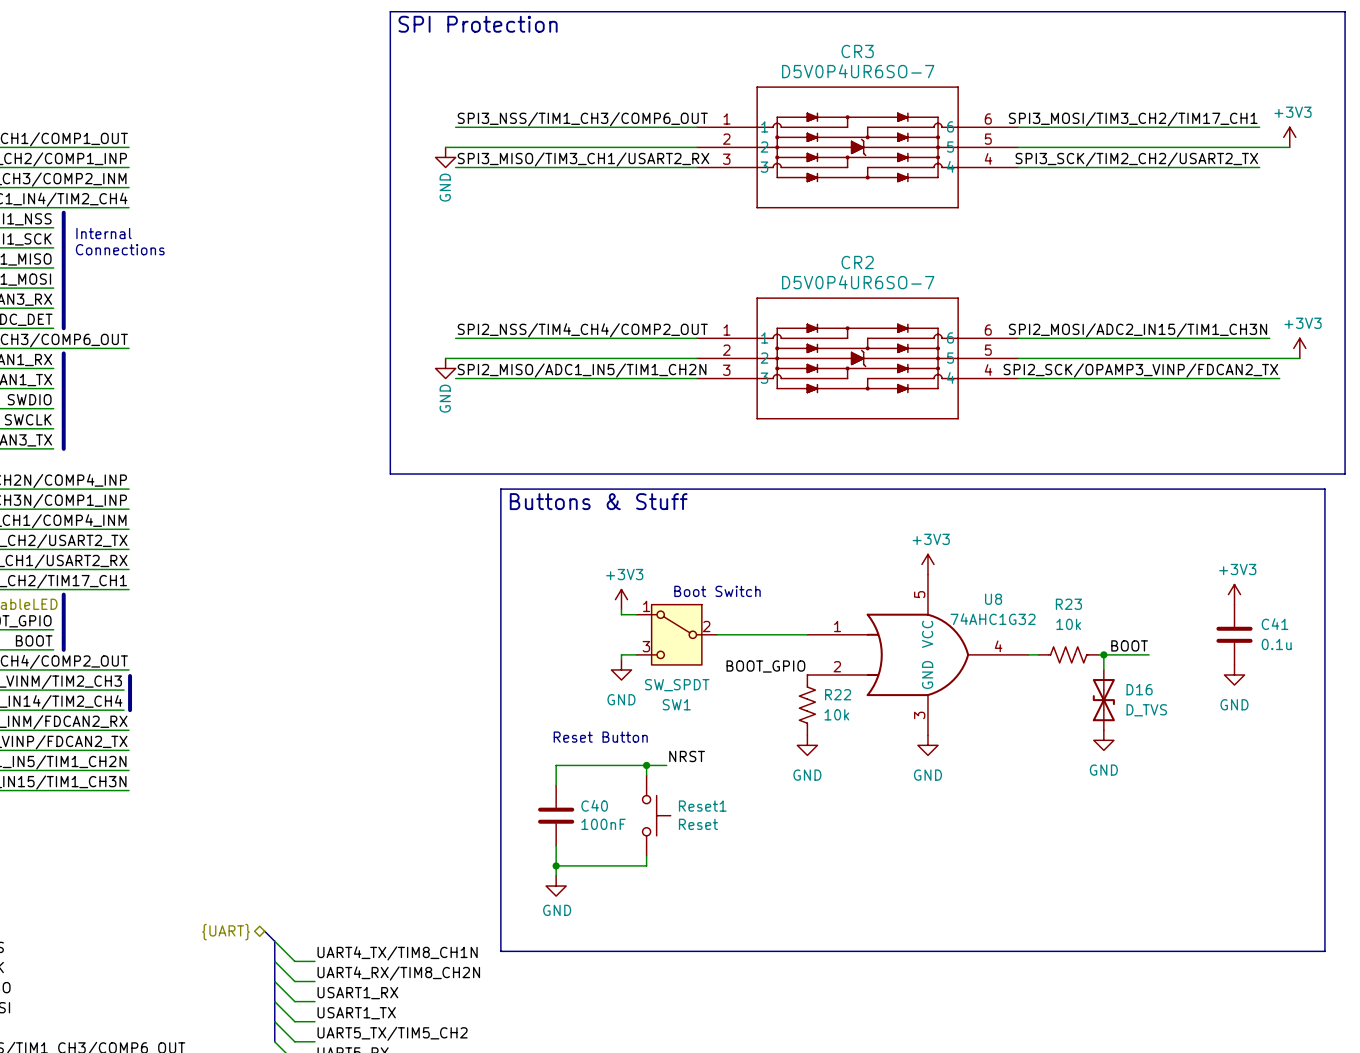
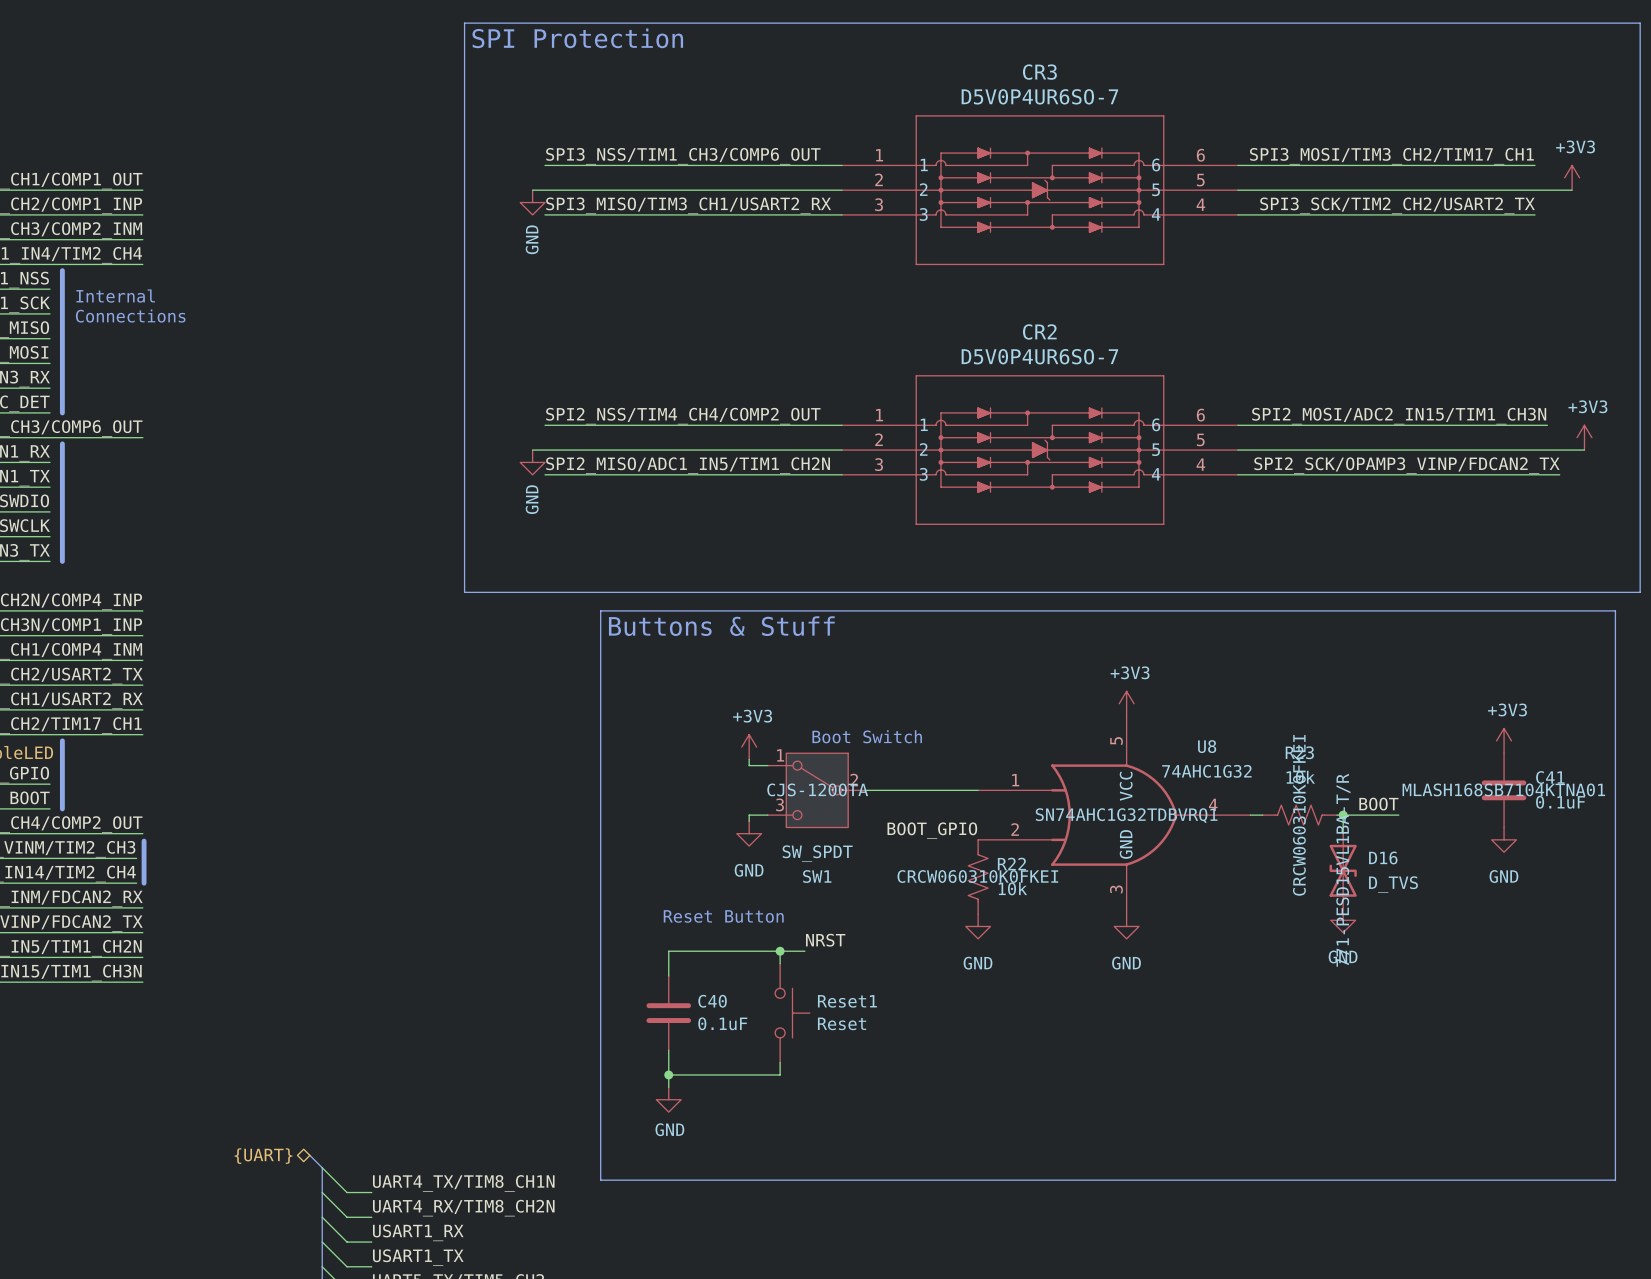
SW1 text: none -> CJS-1200TA (817, 789)
C41 text: none -> MLASH168SB7104KTNA01 (1503, 789)
C41 value: 0.1u (1276, 644) -> 0.1uF (1560, 802)
U8 text: none -> SN74AHC1G32TDBVRQ1 (1126, 815)
R23 text: none -> CRCW060310K0FKEI (1299, 815)
D16 text: none -> 771-PESD15VL1BA-T/R (1343, 870)
R22 text: none -> CRCW060310K0FKEI (977, 876)
C40 value: 100nF (603, 824) -> 0.1uF (722, 1023)

